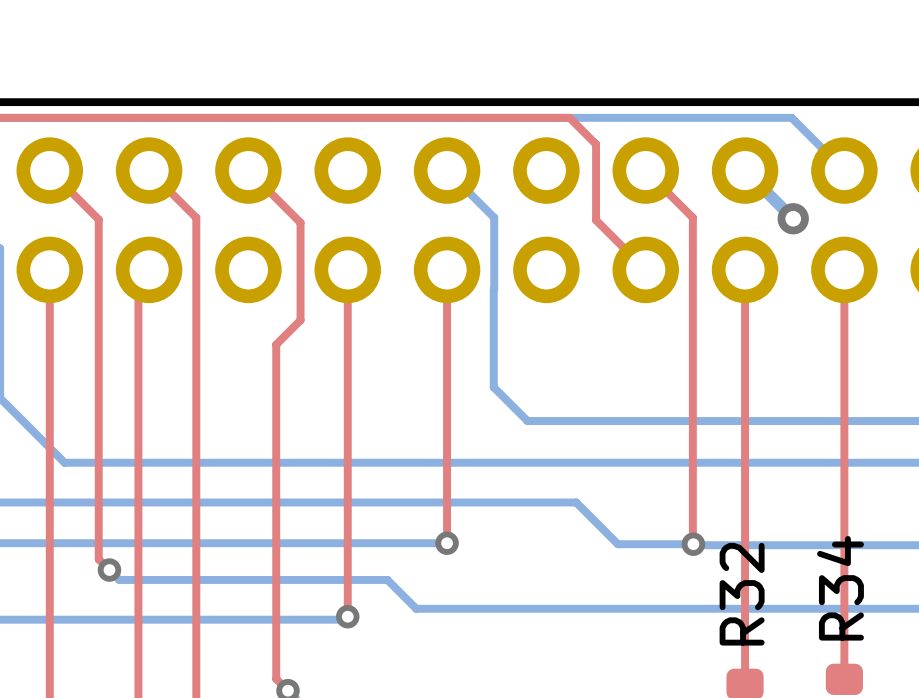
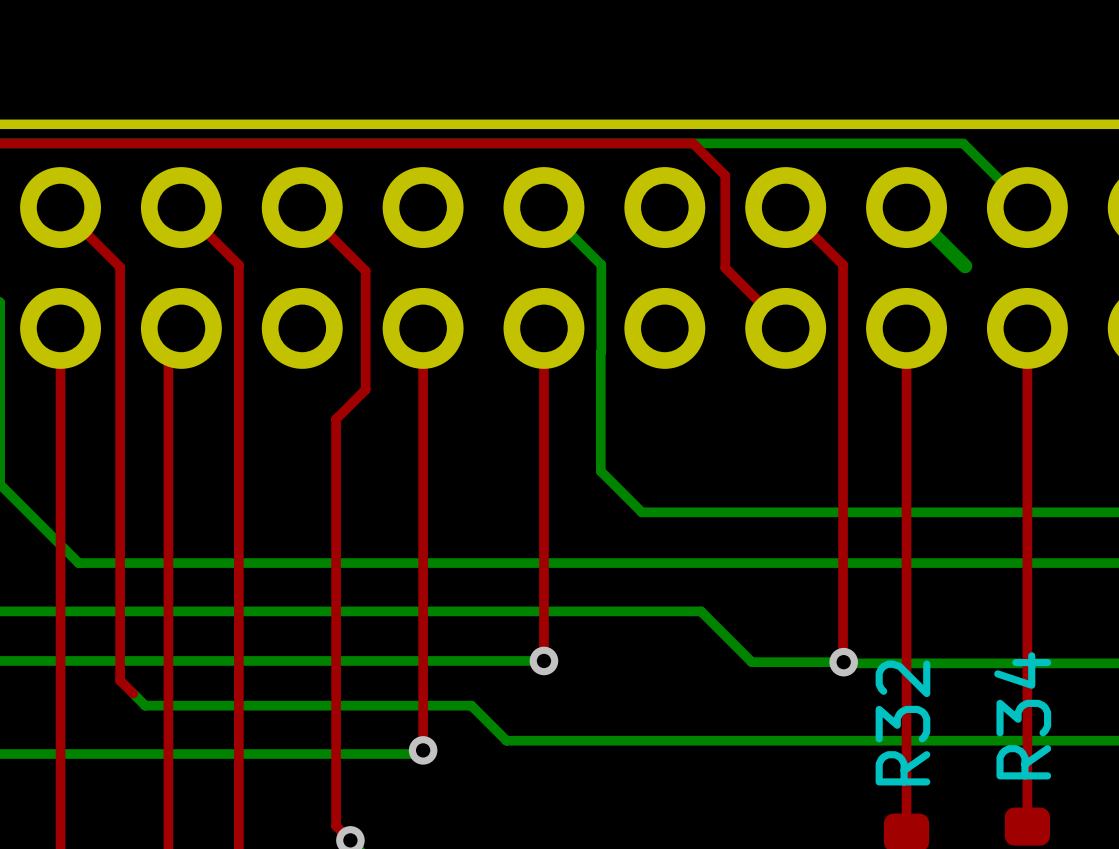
via: (793, 218) -> none
via: (109, 570) -> none

